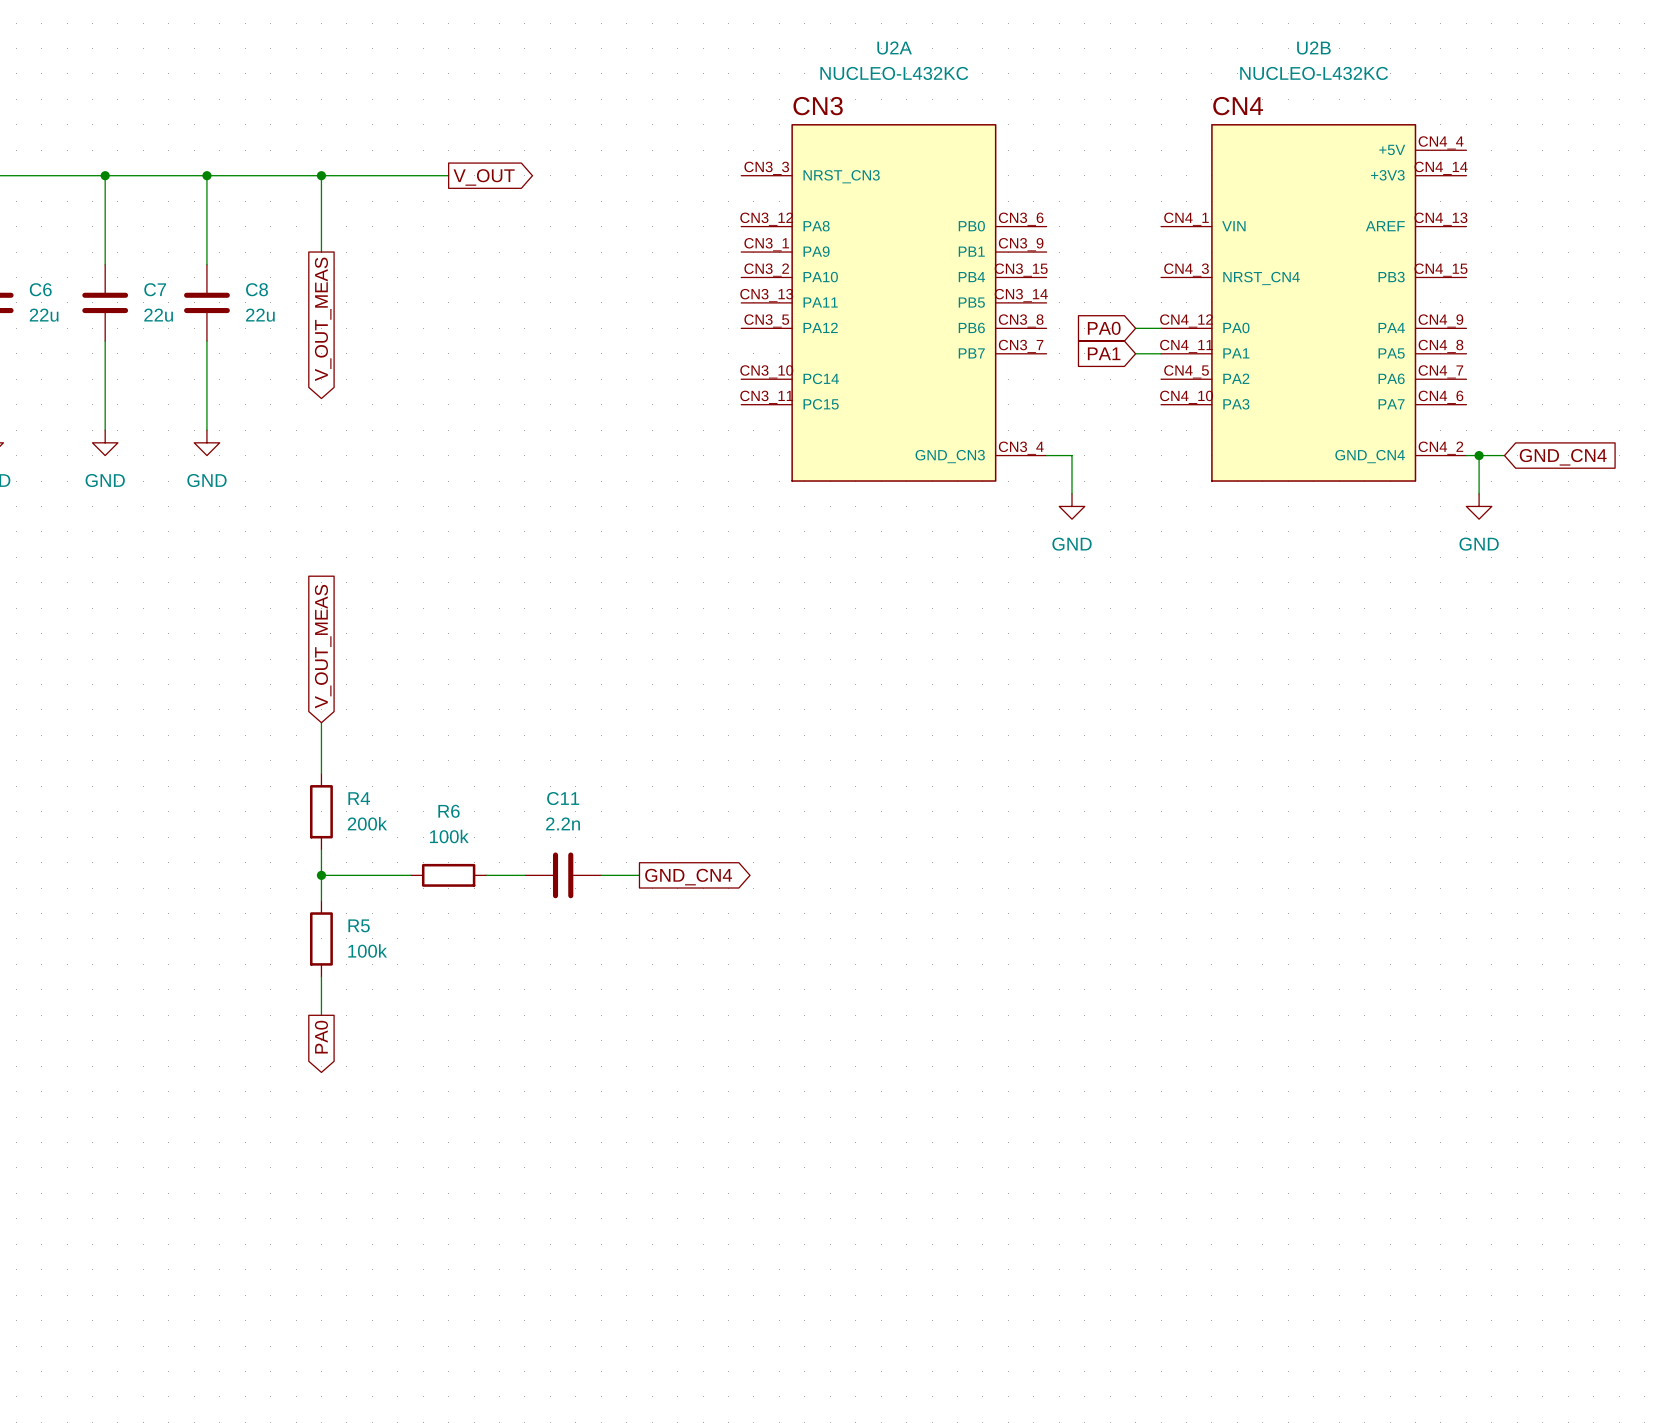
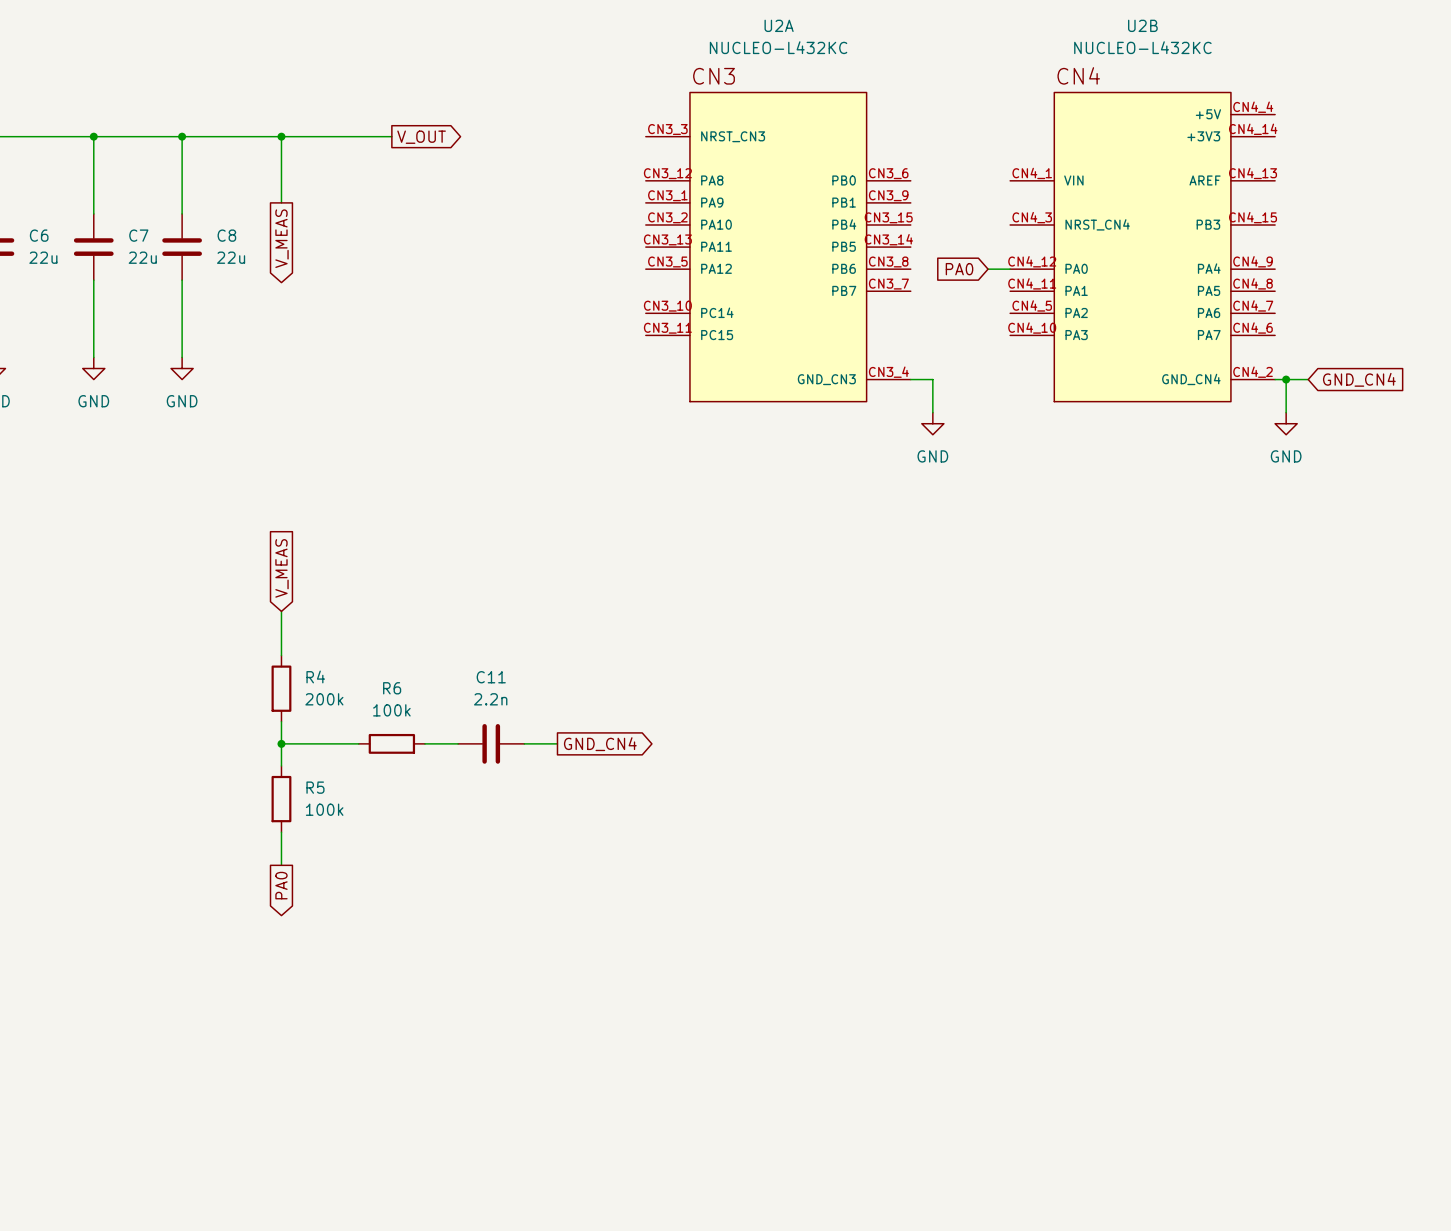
global label: V_OUT_MEAS (323, 319) -> V_MEAS (281, 238)
global label: PA1 (1104, 353) -> none
wire: (1135, 353) (1161, 353) -> none
global label: V_OUT_MEAS (323, 646) -> V_MEAS (281, 568)

